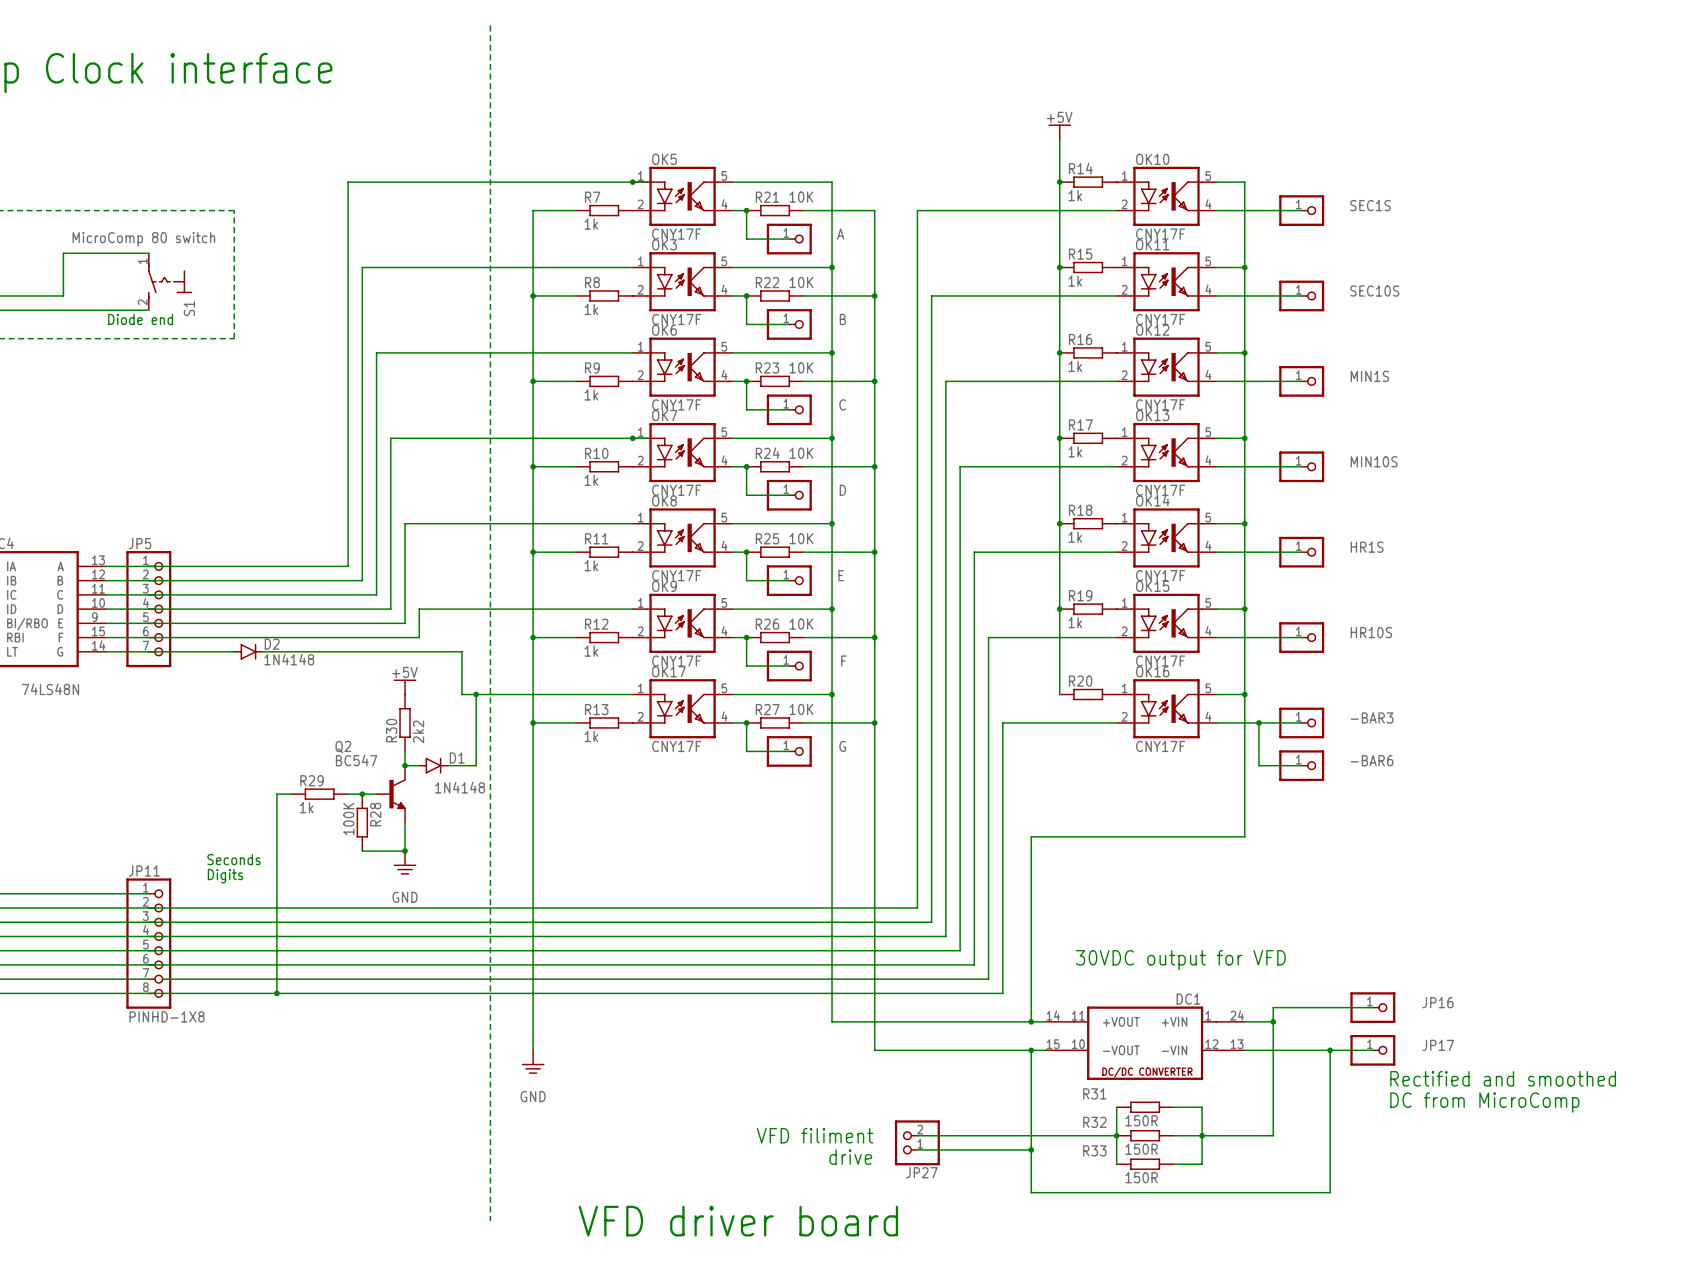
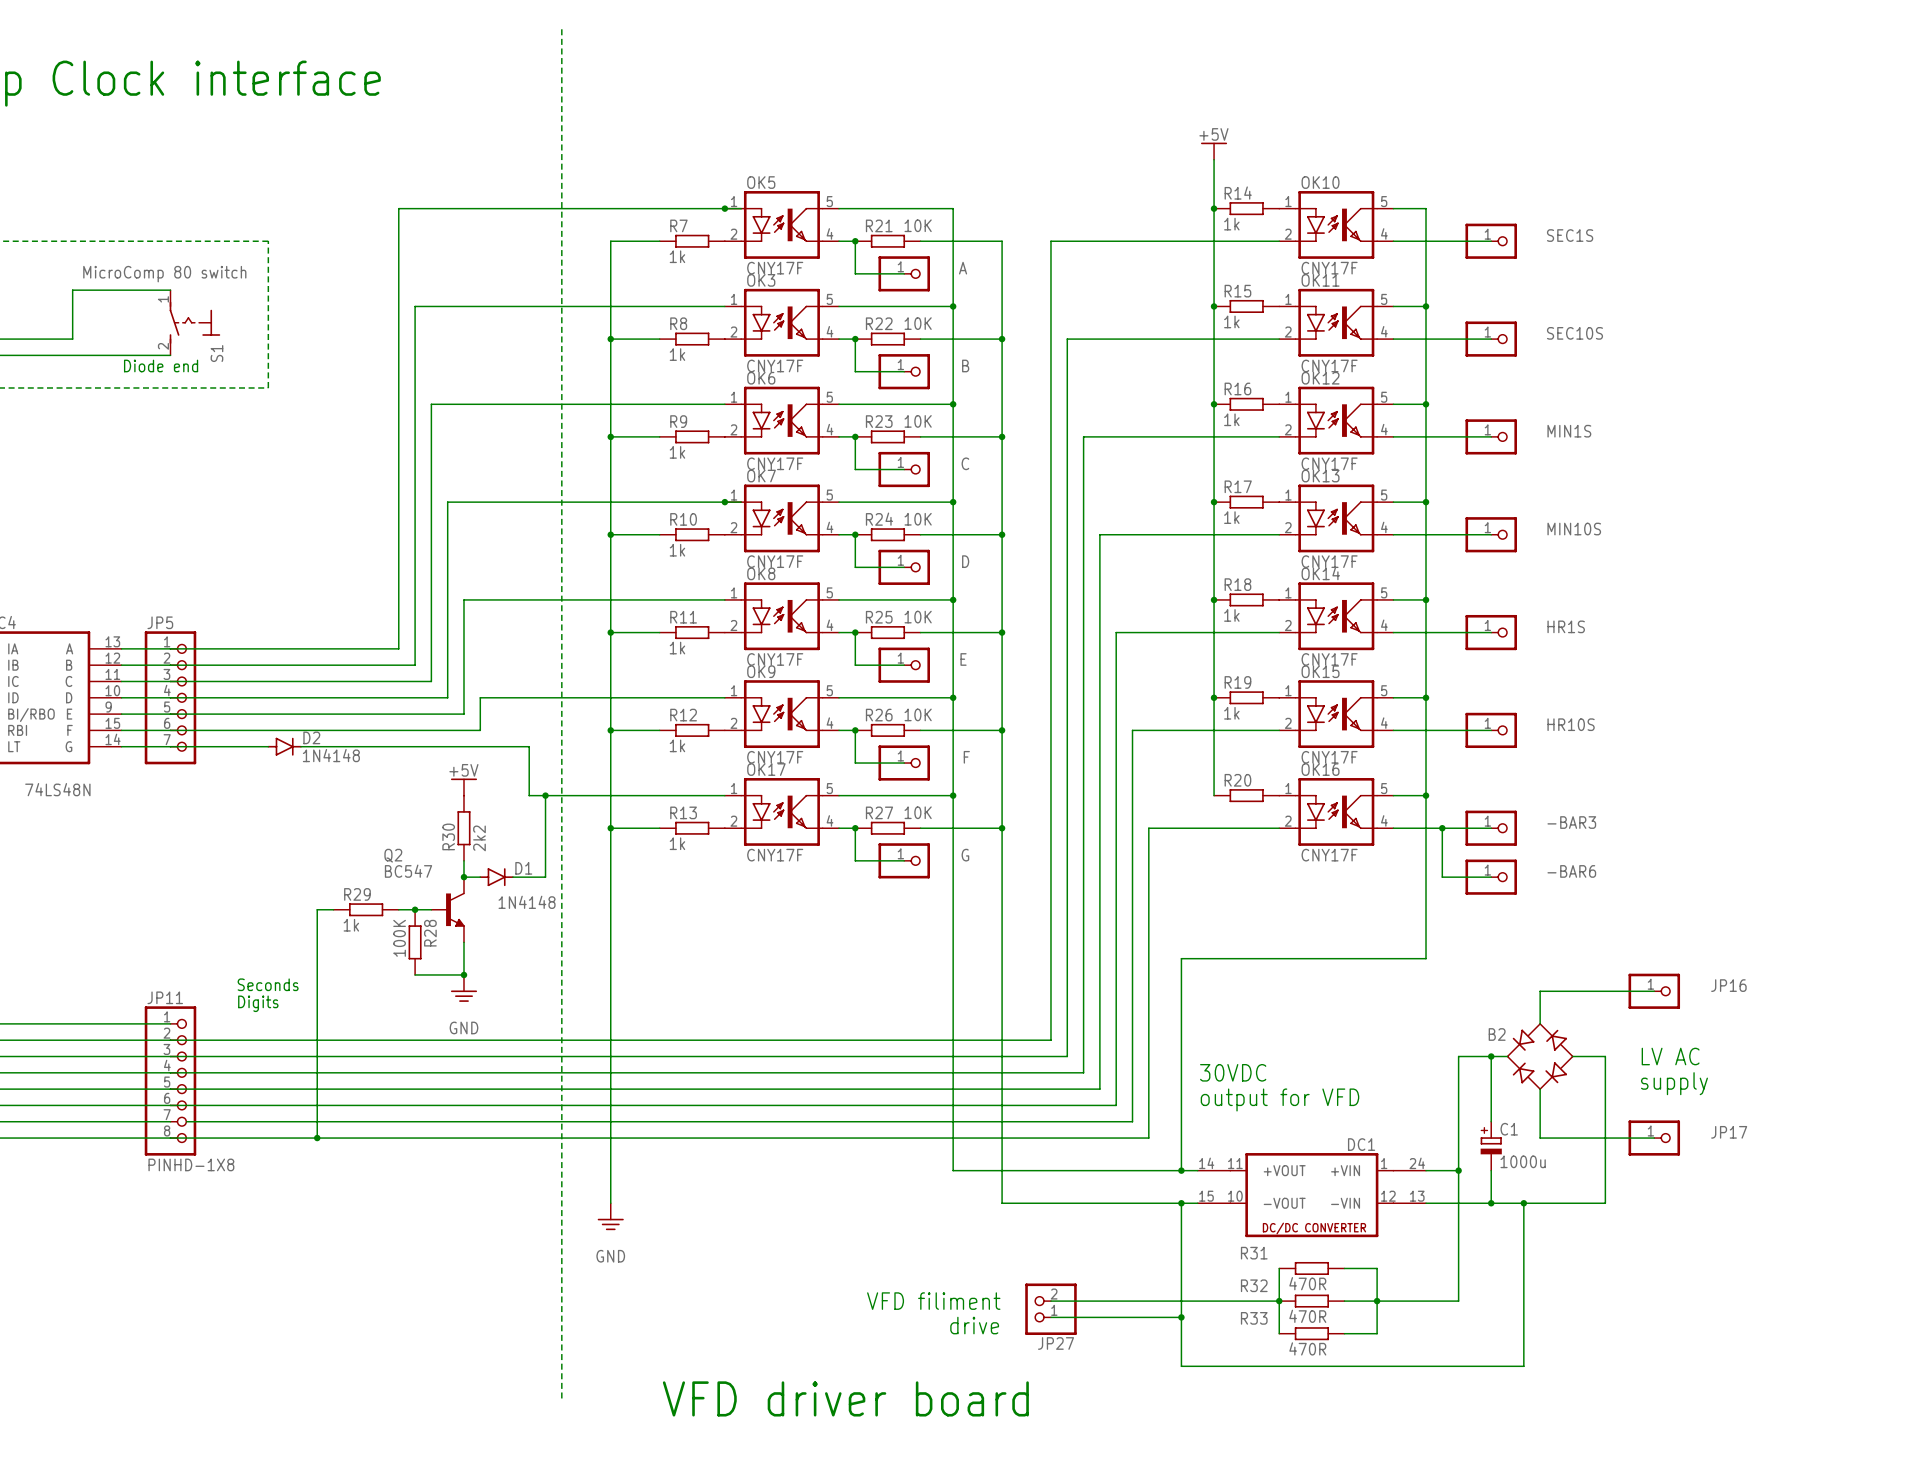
wire: none -> (1654, 991) (1540, 991) (1540, 1023)
wire: none -> (1491, 1056) (1491, 1121)
junction: none -> (1491, 1056)
B2: none -> (1540, 1056)
wire: none -> (1572, 1056) (1605, 1056) (1605, 1203) (1572, 1203)
text: none -> LV AC (1670, 1056)
text: none -> 30VDC (1233, 1072)
text: none -> supply (1674, 1083)
wire: none -> (1540, 1089) (1540, 1138) (1654, 1138)
text: 30VDC output for VFD (1180, 960) -> output for VFD (1280, 1099)
C1: none -> 1000u (1491, 1146)
wire: (1273, 1007) (1372, 1007) -> (1458, 1154) (1458, 1056) (1507, 1056)
JP16 position: (1372, 1007) -> (1654, 991)
wire: none -> (1491, 1170) (1491, 1203)
junction: none -> (1491, 1203)
JP17 position: (1372, 1050) -> (1654, 1138)
text: Rectified and smoothed (1503, 1078) -> none
text: DC from MicroComp (1484, 1102) -> none
R31 value: 150R (1141, 1120) -> 470R (1307, 1283)
R32 value: 150R (1141, 1149) -> 470R (1307, 1316)
R33 value: 150R (1141, 1177) -> 470R (1307, 1348)

